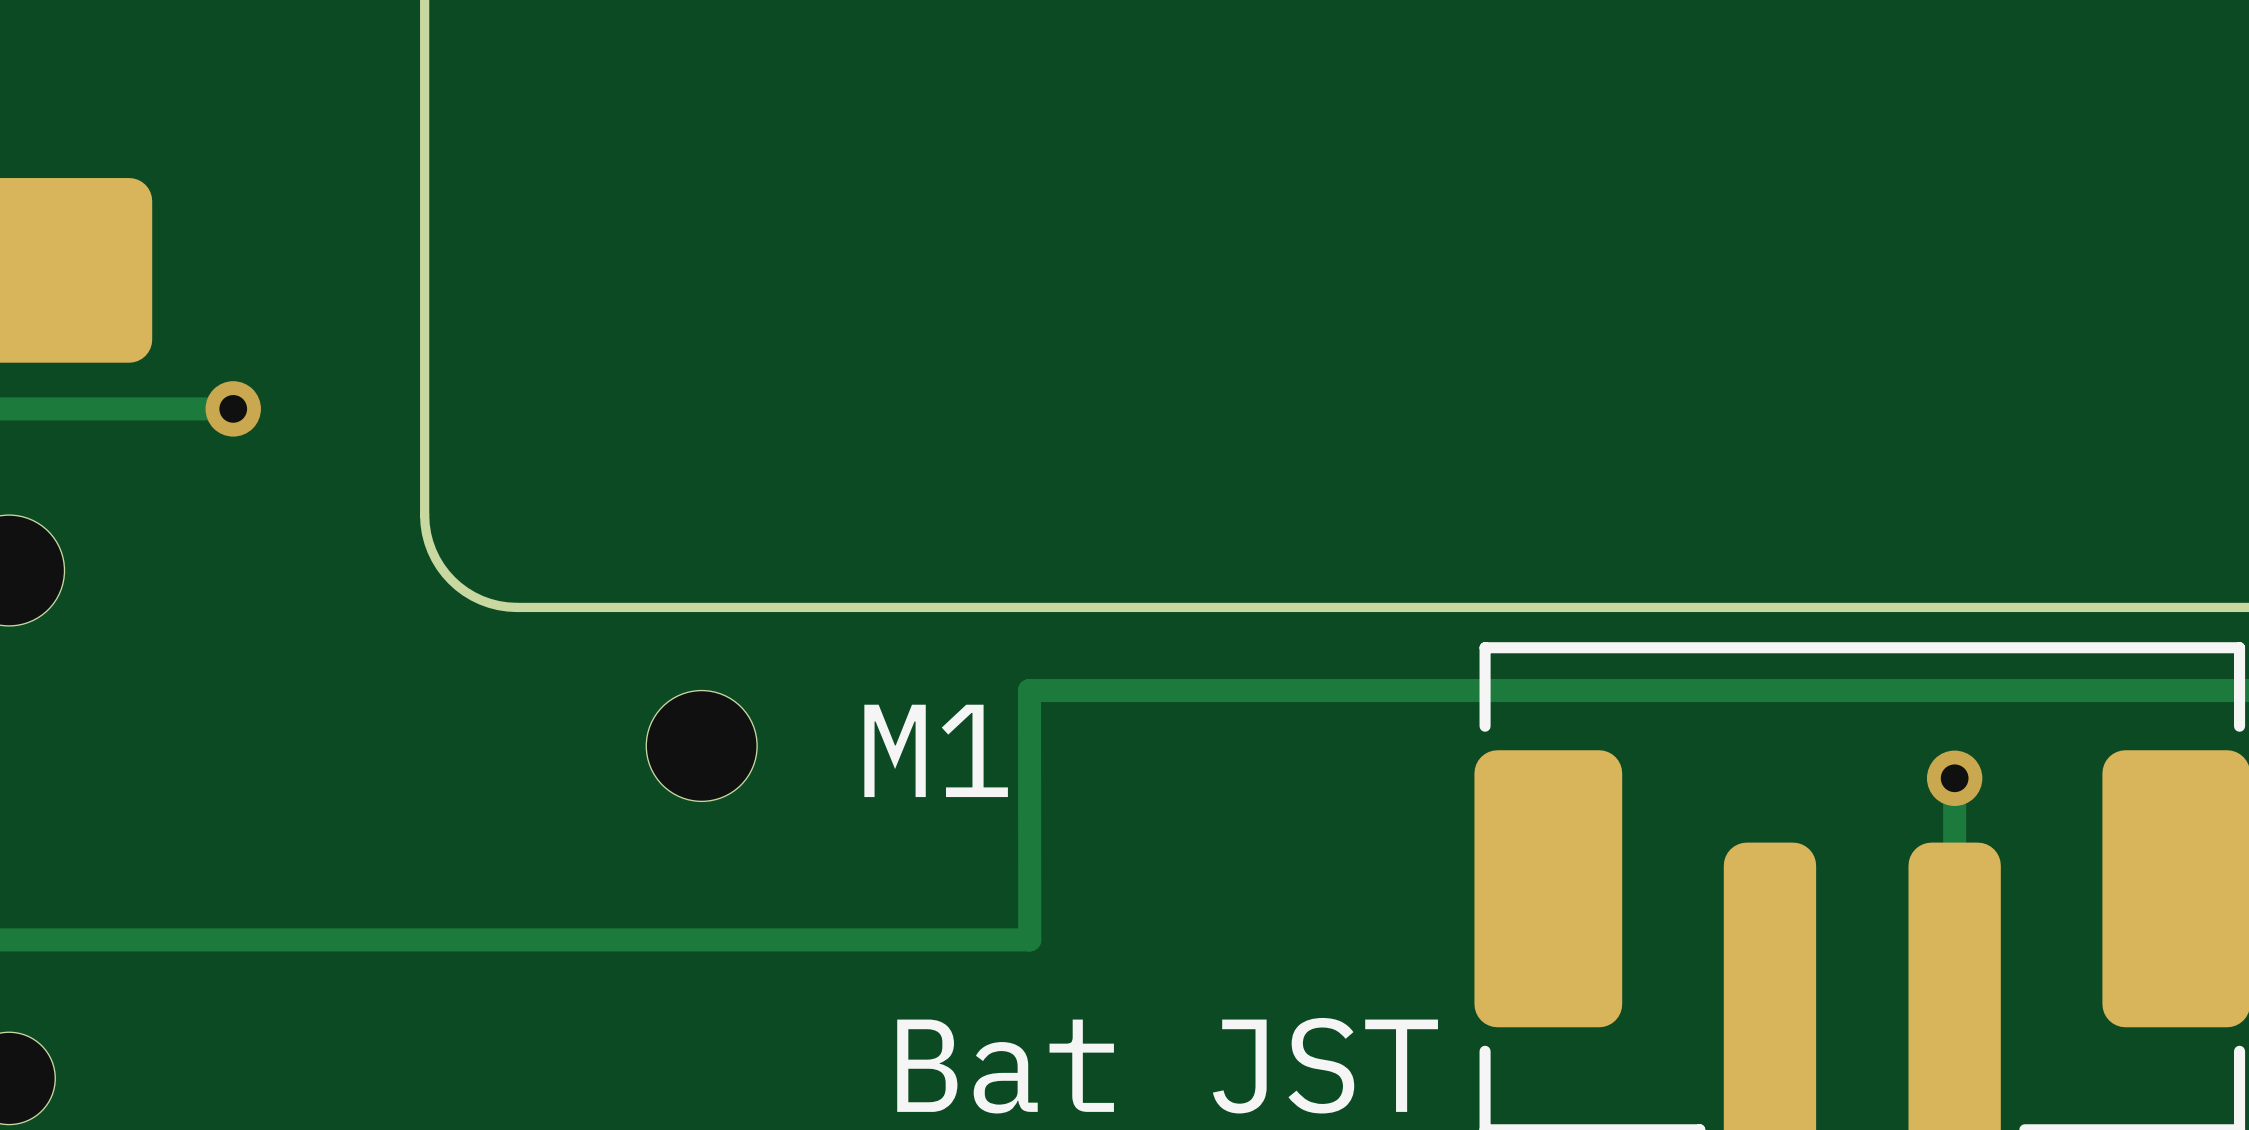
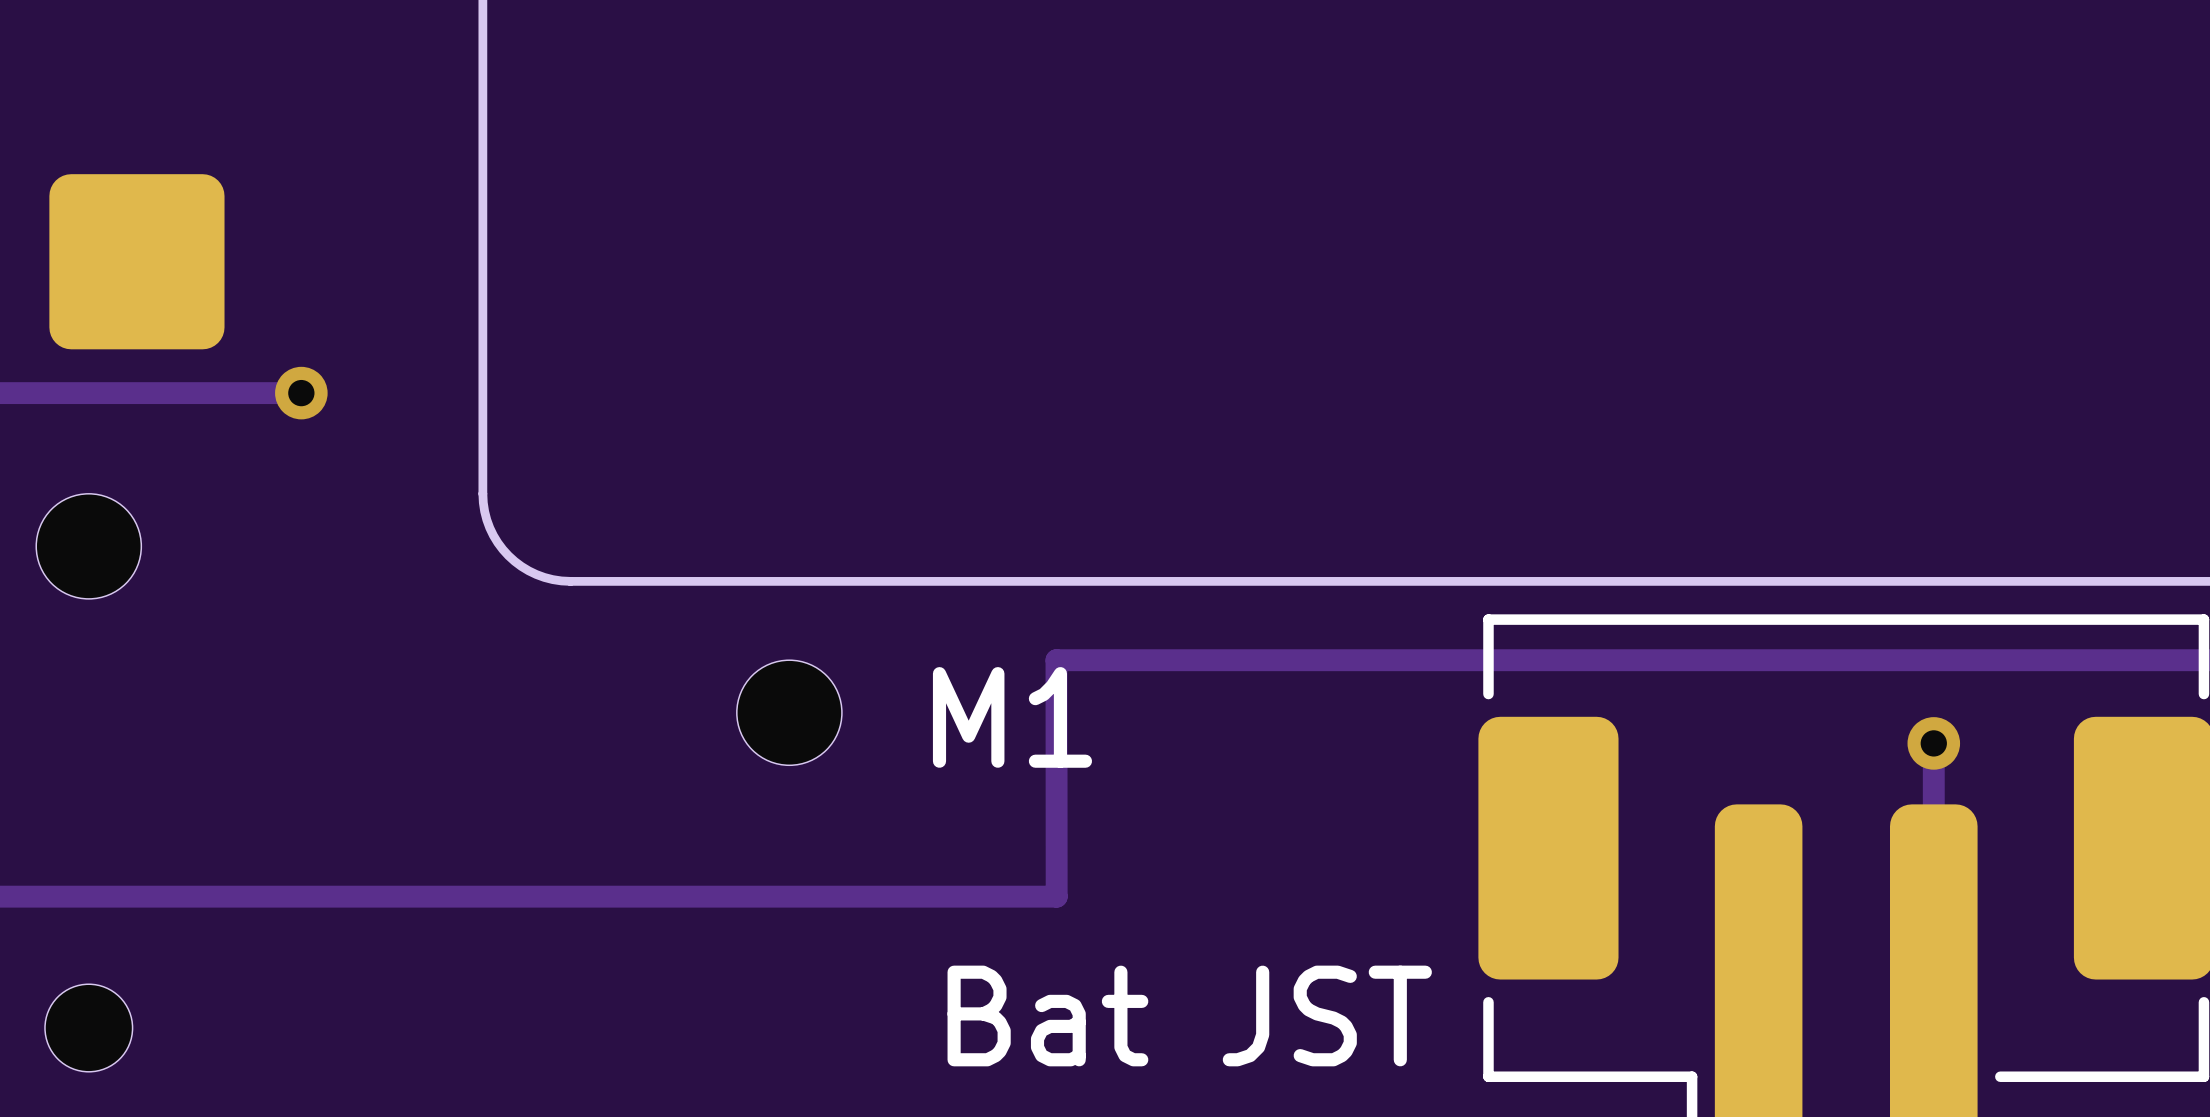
M1 position: (701, 745) -> (789, 712)

